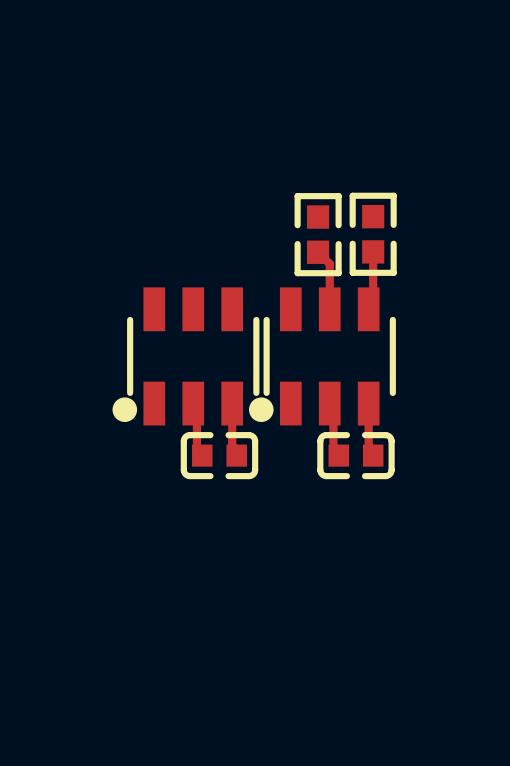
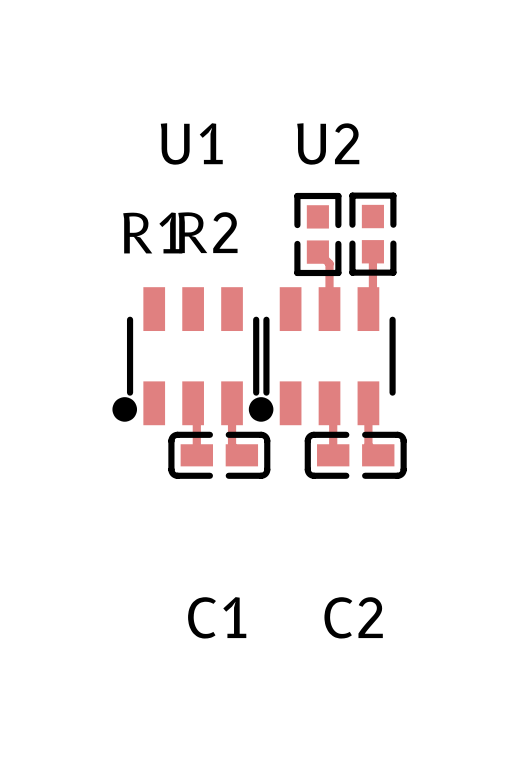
U1 name: none -> U1 (191, 143)
U2 name: none -> U2 (328, 143)
R2 name: none -> R2 (207, 232)
R1 name: none -> R1 (152, 232)
part: (219, 455) -> none
C1: none -> (219, 455)
part: (355, 455) -> none
C2: none -> (355, 455)

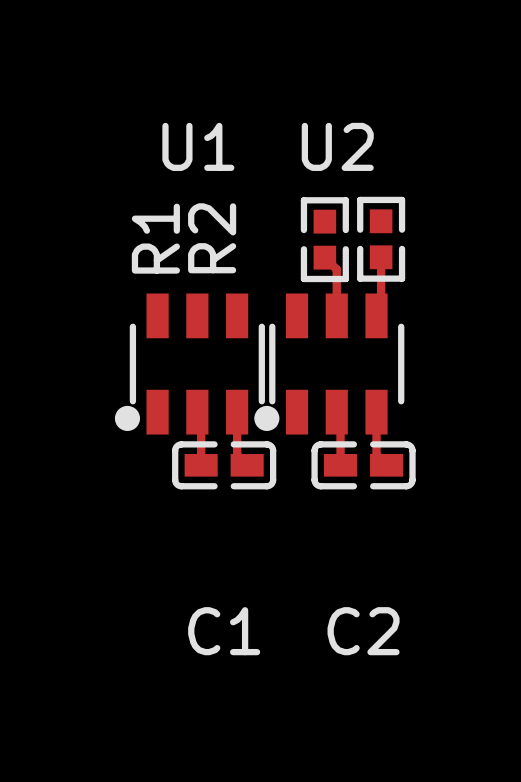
R1 name rotation: 0° (152, 232) -> 90° counterclockwise (155, 238)
R2 name rotation: 0° (207, 232) -> 90° counterclockwise (212, 238)

